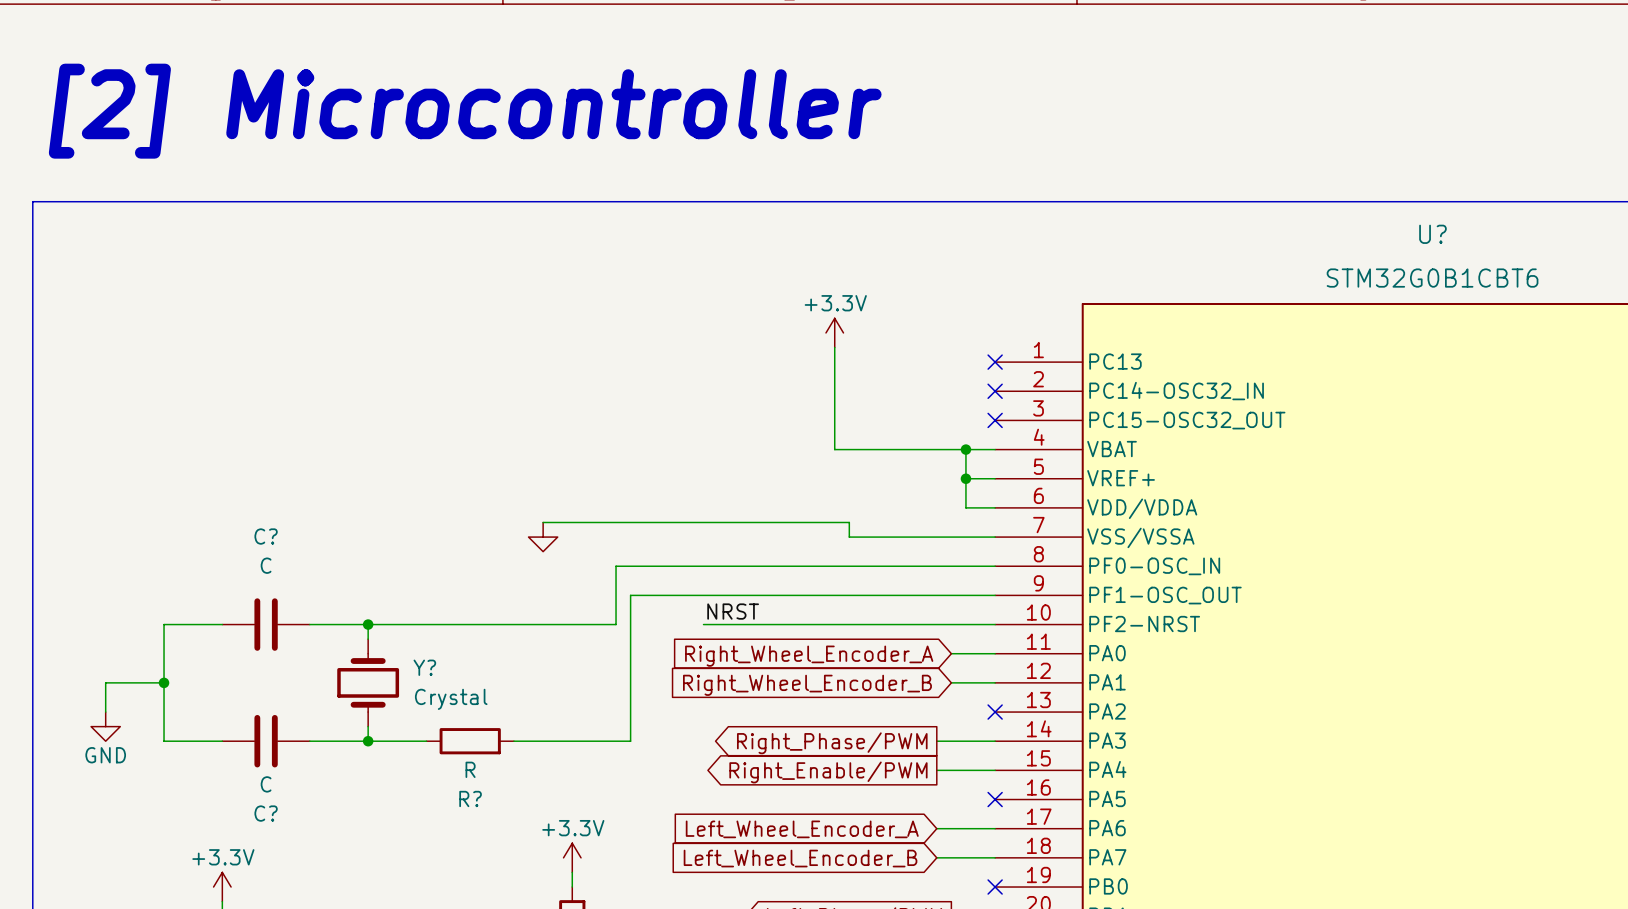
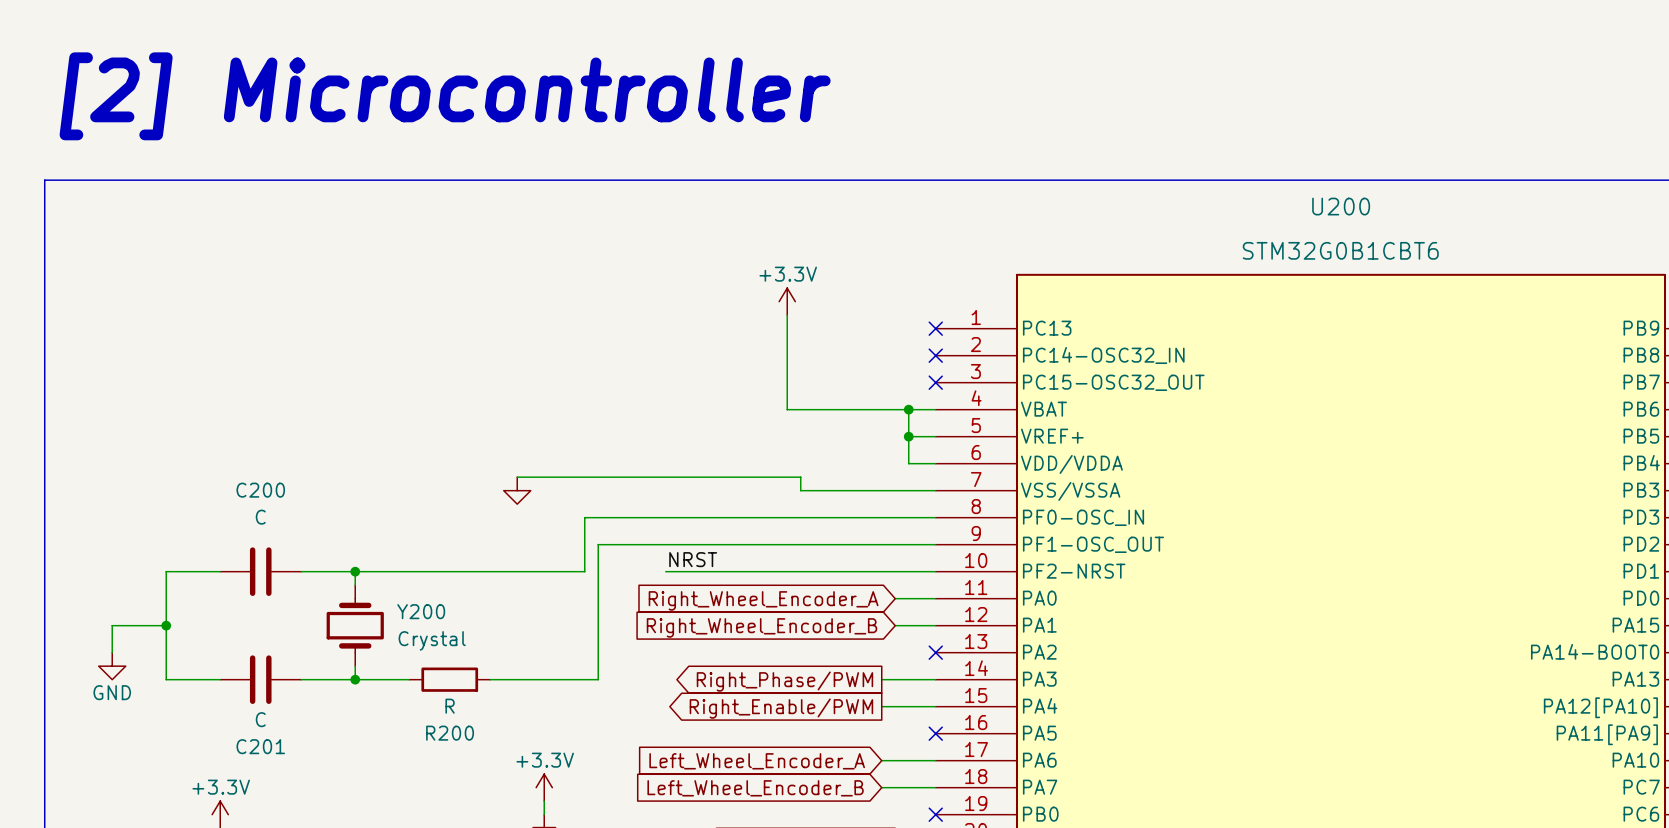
U? name: U? (1432, 234) -> U200 (1341, 206)
C? name: C? (266, 536) -> C200 (260, 490)
Y? name: Y? (424, 667) -> Y200 (421, 611)
R? name: R? (470, 798) -> R200 (450, 733)
C? name: C? (266, 813) -> C201 (260, 746)

